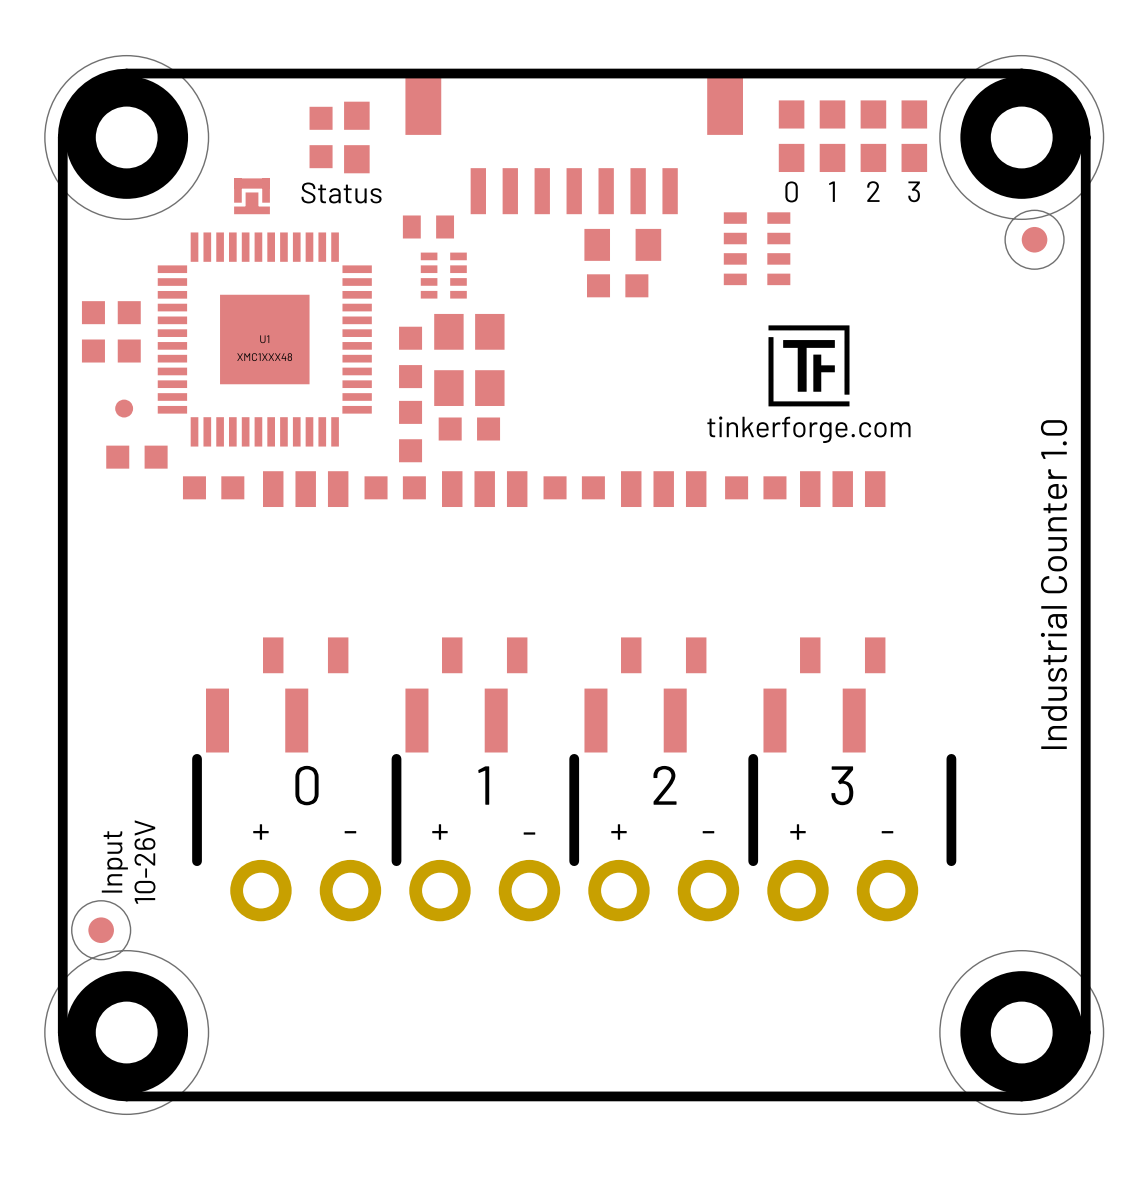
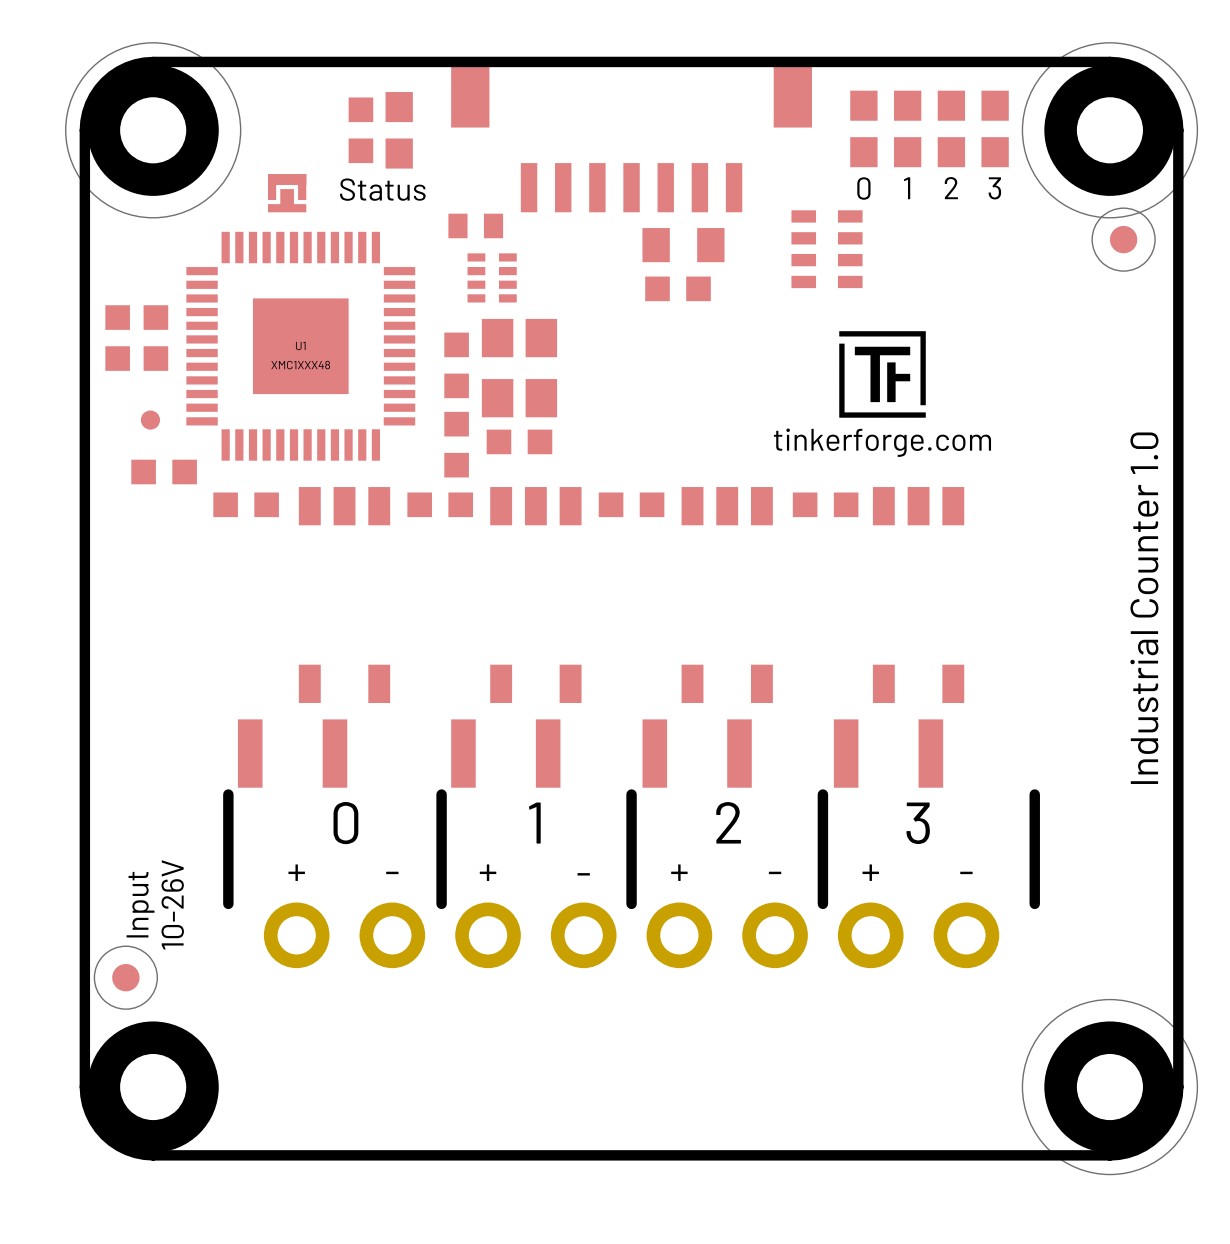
part footprint: [44, 950, 209, 1115] -> [87, 1021, 219, 1153]

